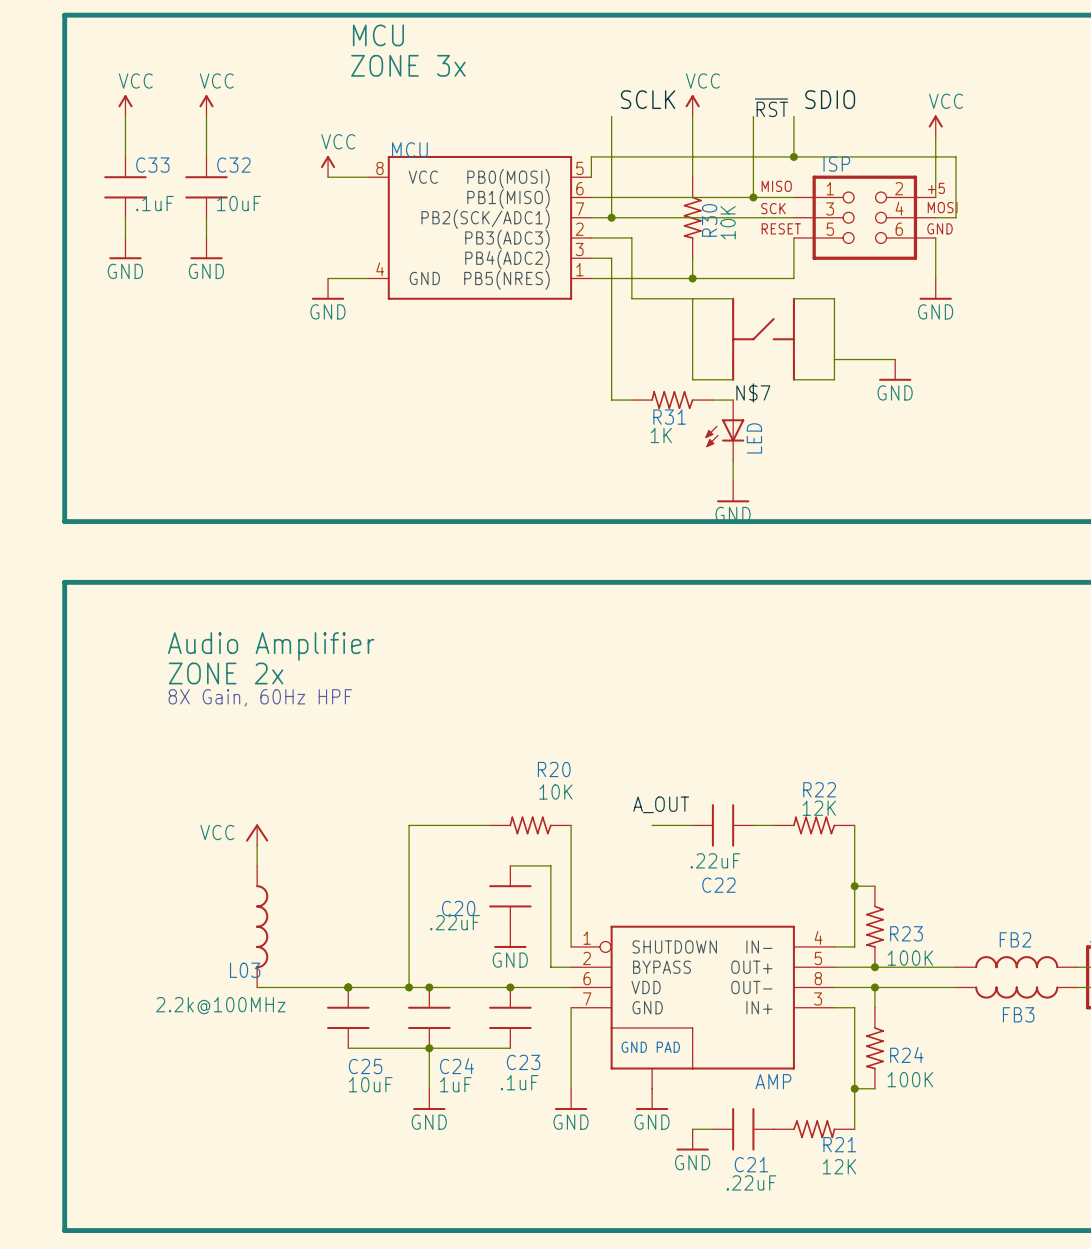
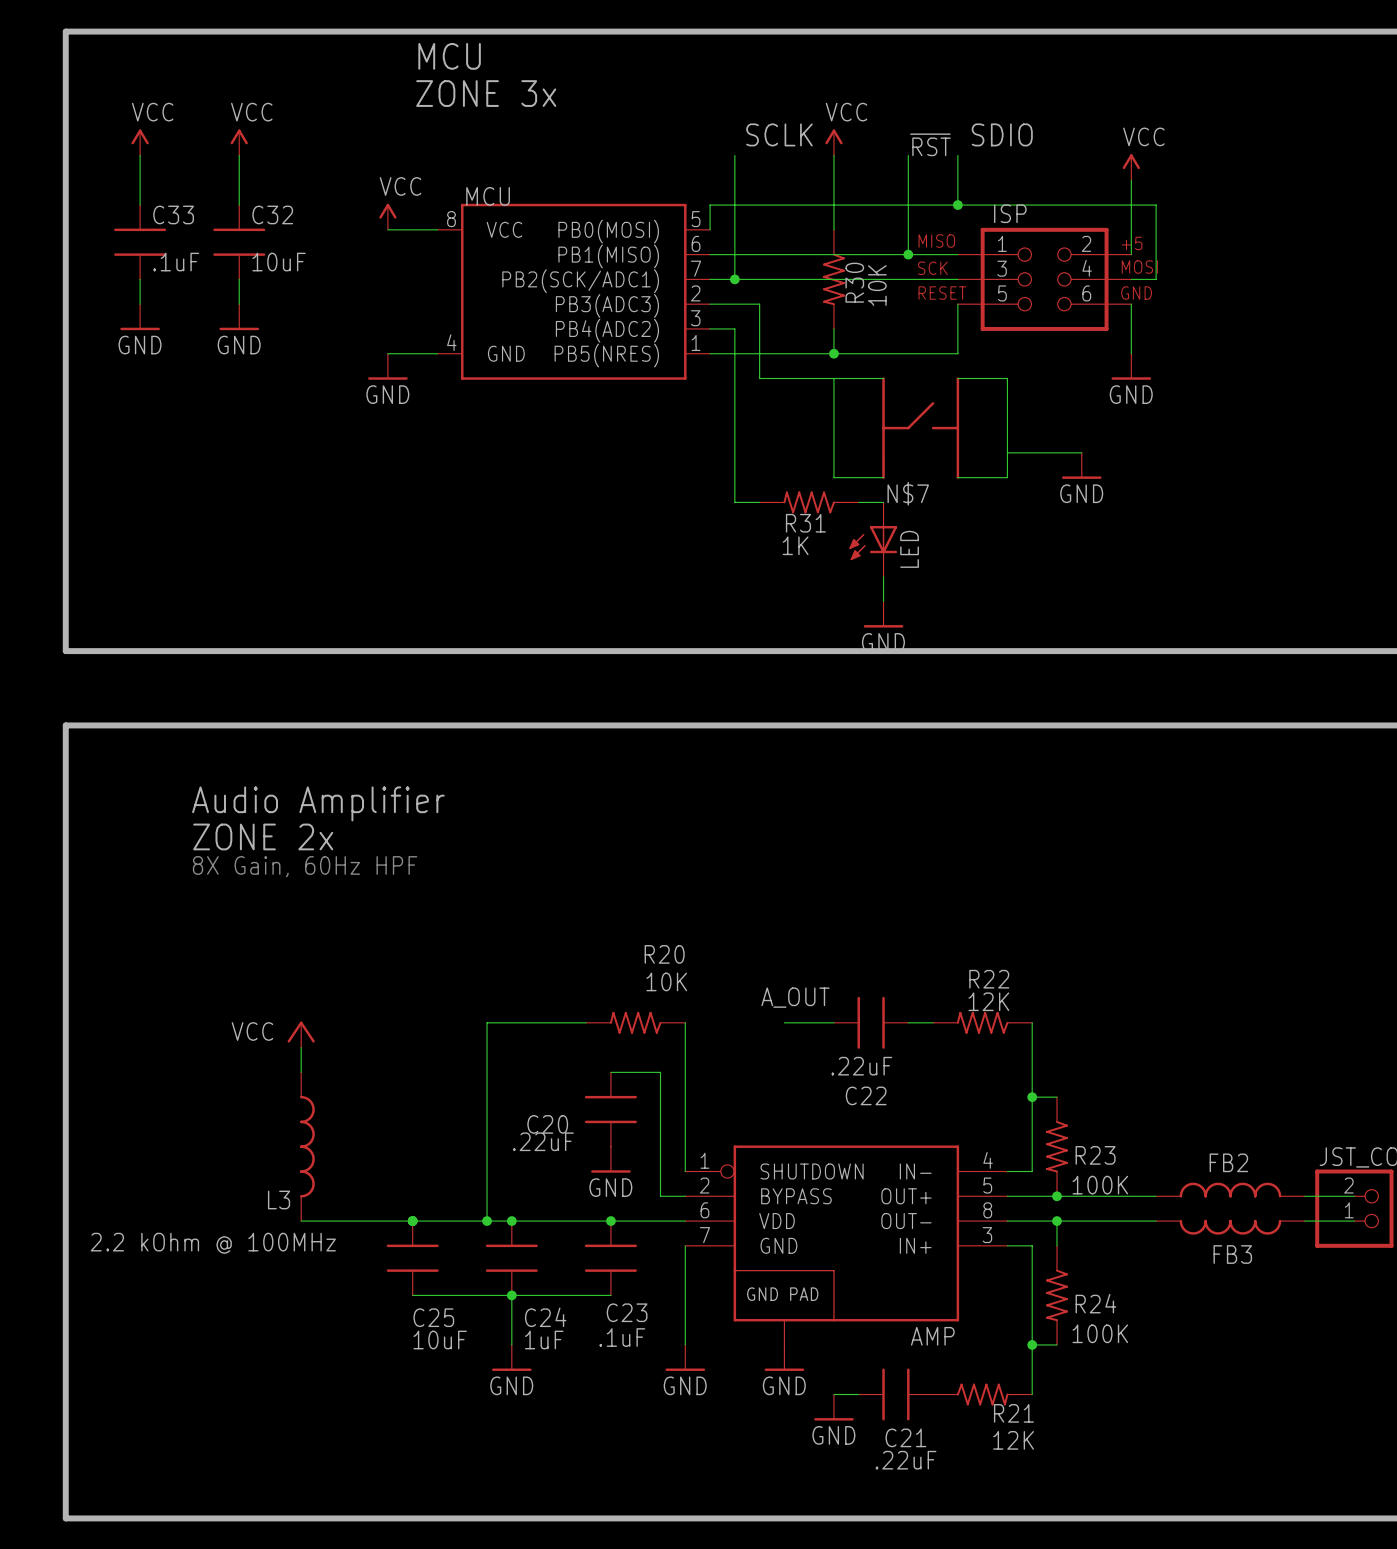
L03 name: L03 (245, 970) -> L3 (279, 1199)
L03 value: 2.2k@100MHz (220, 1005) -> 2.2 kOhm @ 100MHz (213, 1243)

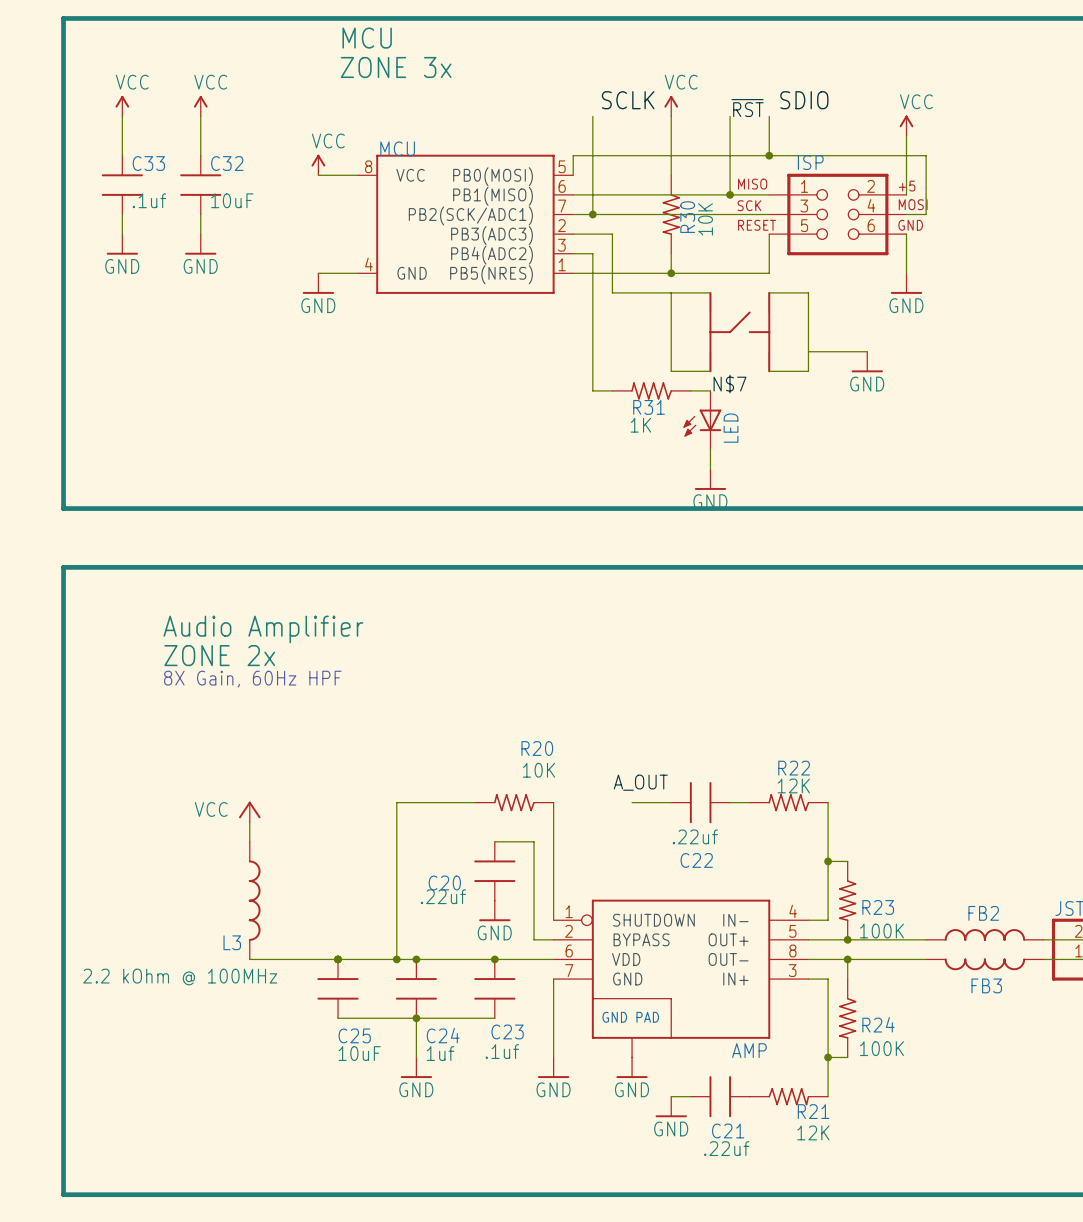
C33 value: .1uF (176, 262) -> .1uf (149, 200)
C22 value: .22uF (861, 1066) -> .22uf (695, 836)
C20 value: .22uF (543, 1141) -> .22uf (443, 896)
C23 value: .1uF (622, 1337) -> .1uf (502, 1051)
C24 value: 1uF (544, 1340) -> 1uf (440, 1053)
C21 value: .22uF (906, 1460) -> .22uf (726, 1148)

